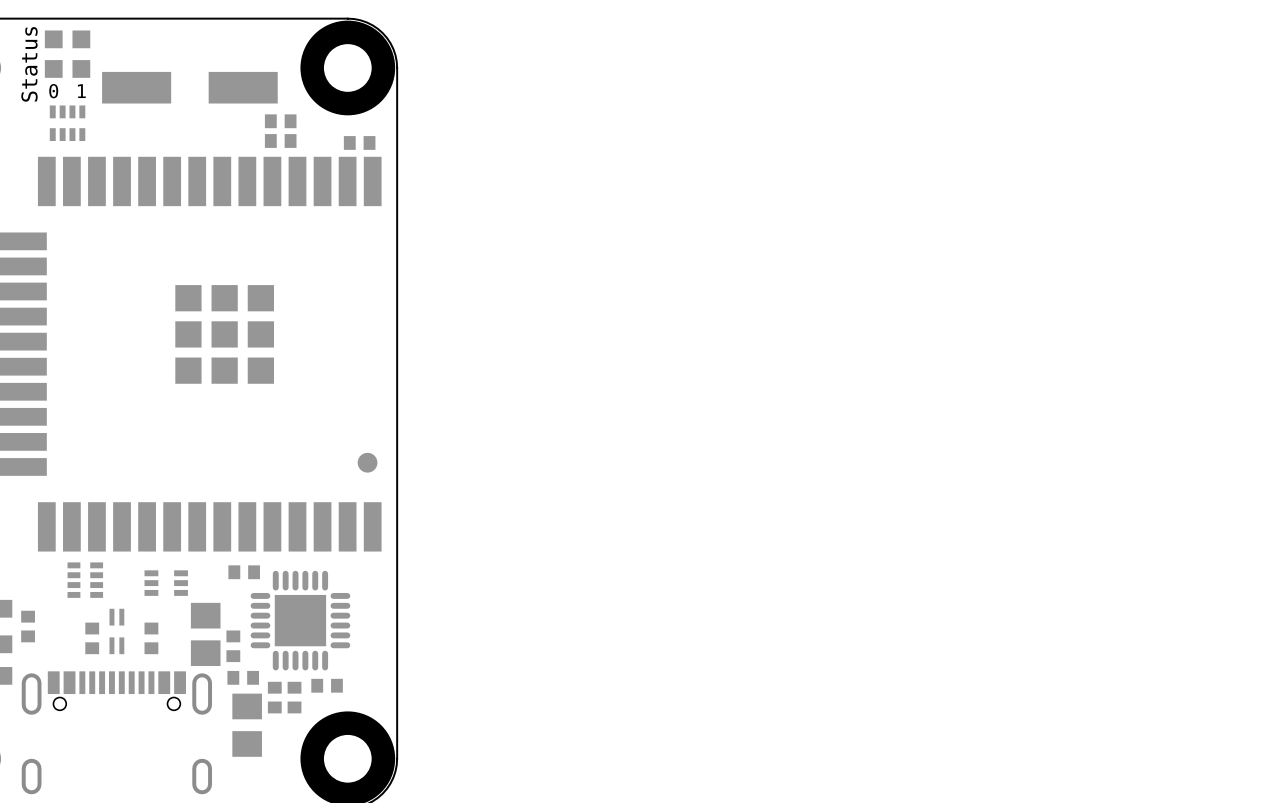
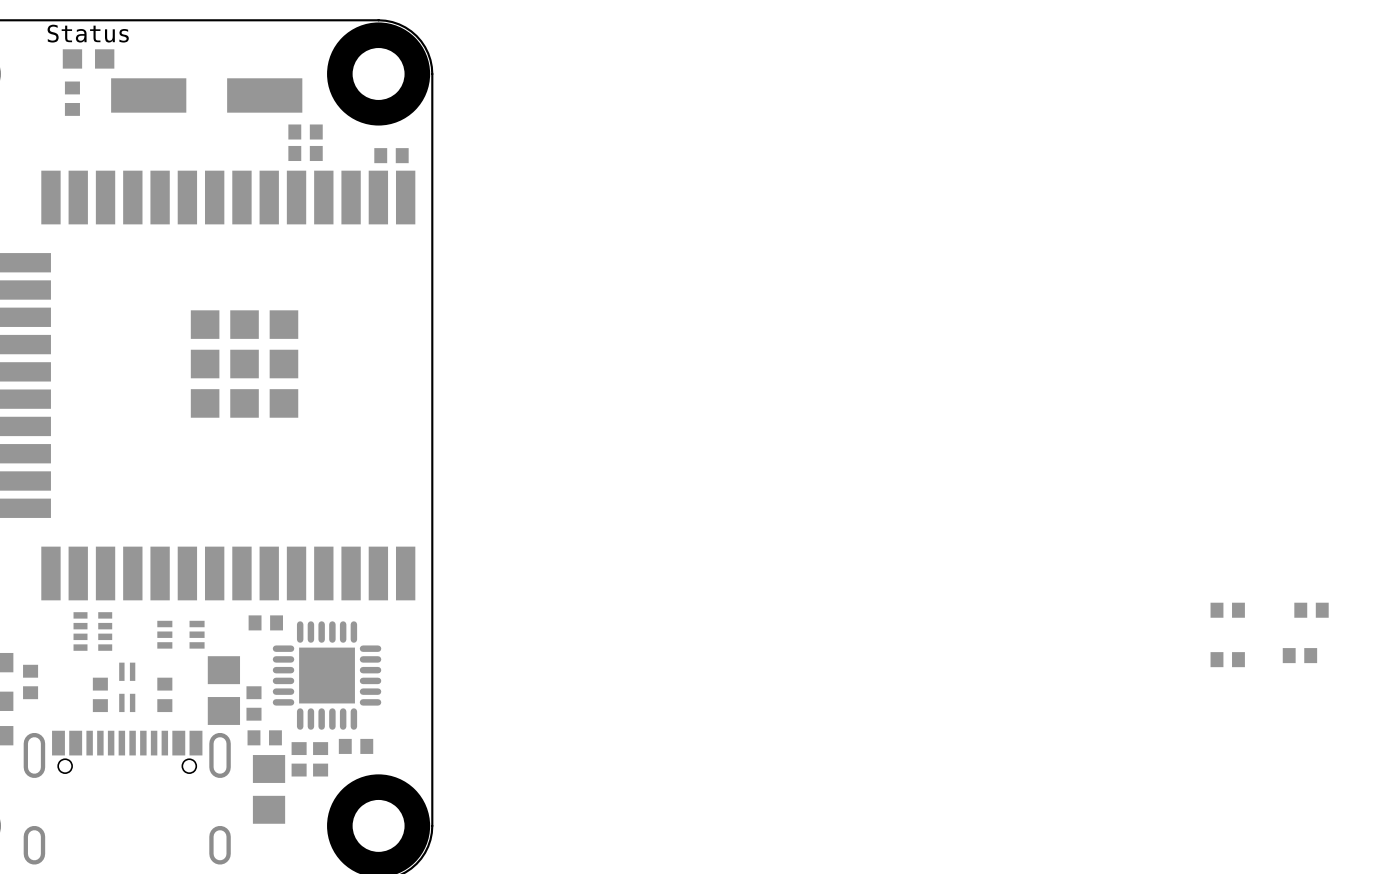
part: (53, 54) -> none
part rotation: 0° (81, 54) -> 90° clockwise (88, 58)
text rotation: 0° (29, 64) -> 90° clockwise (88, 33)
part: none -> (72, 98)
text: 0 (53, 91) -> none
text: 1 (81, 91) -> none
part: (67, 123) -> none
part: (367, 462) -> none
part: none -> (1227, 610)
part: none -> (1311, 610)
part: none -> (1299, 655)
part: none -> (1227, 659)

